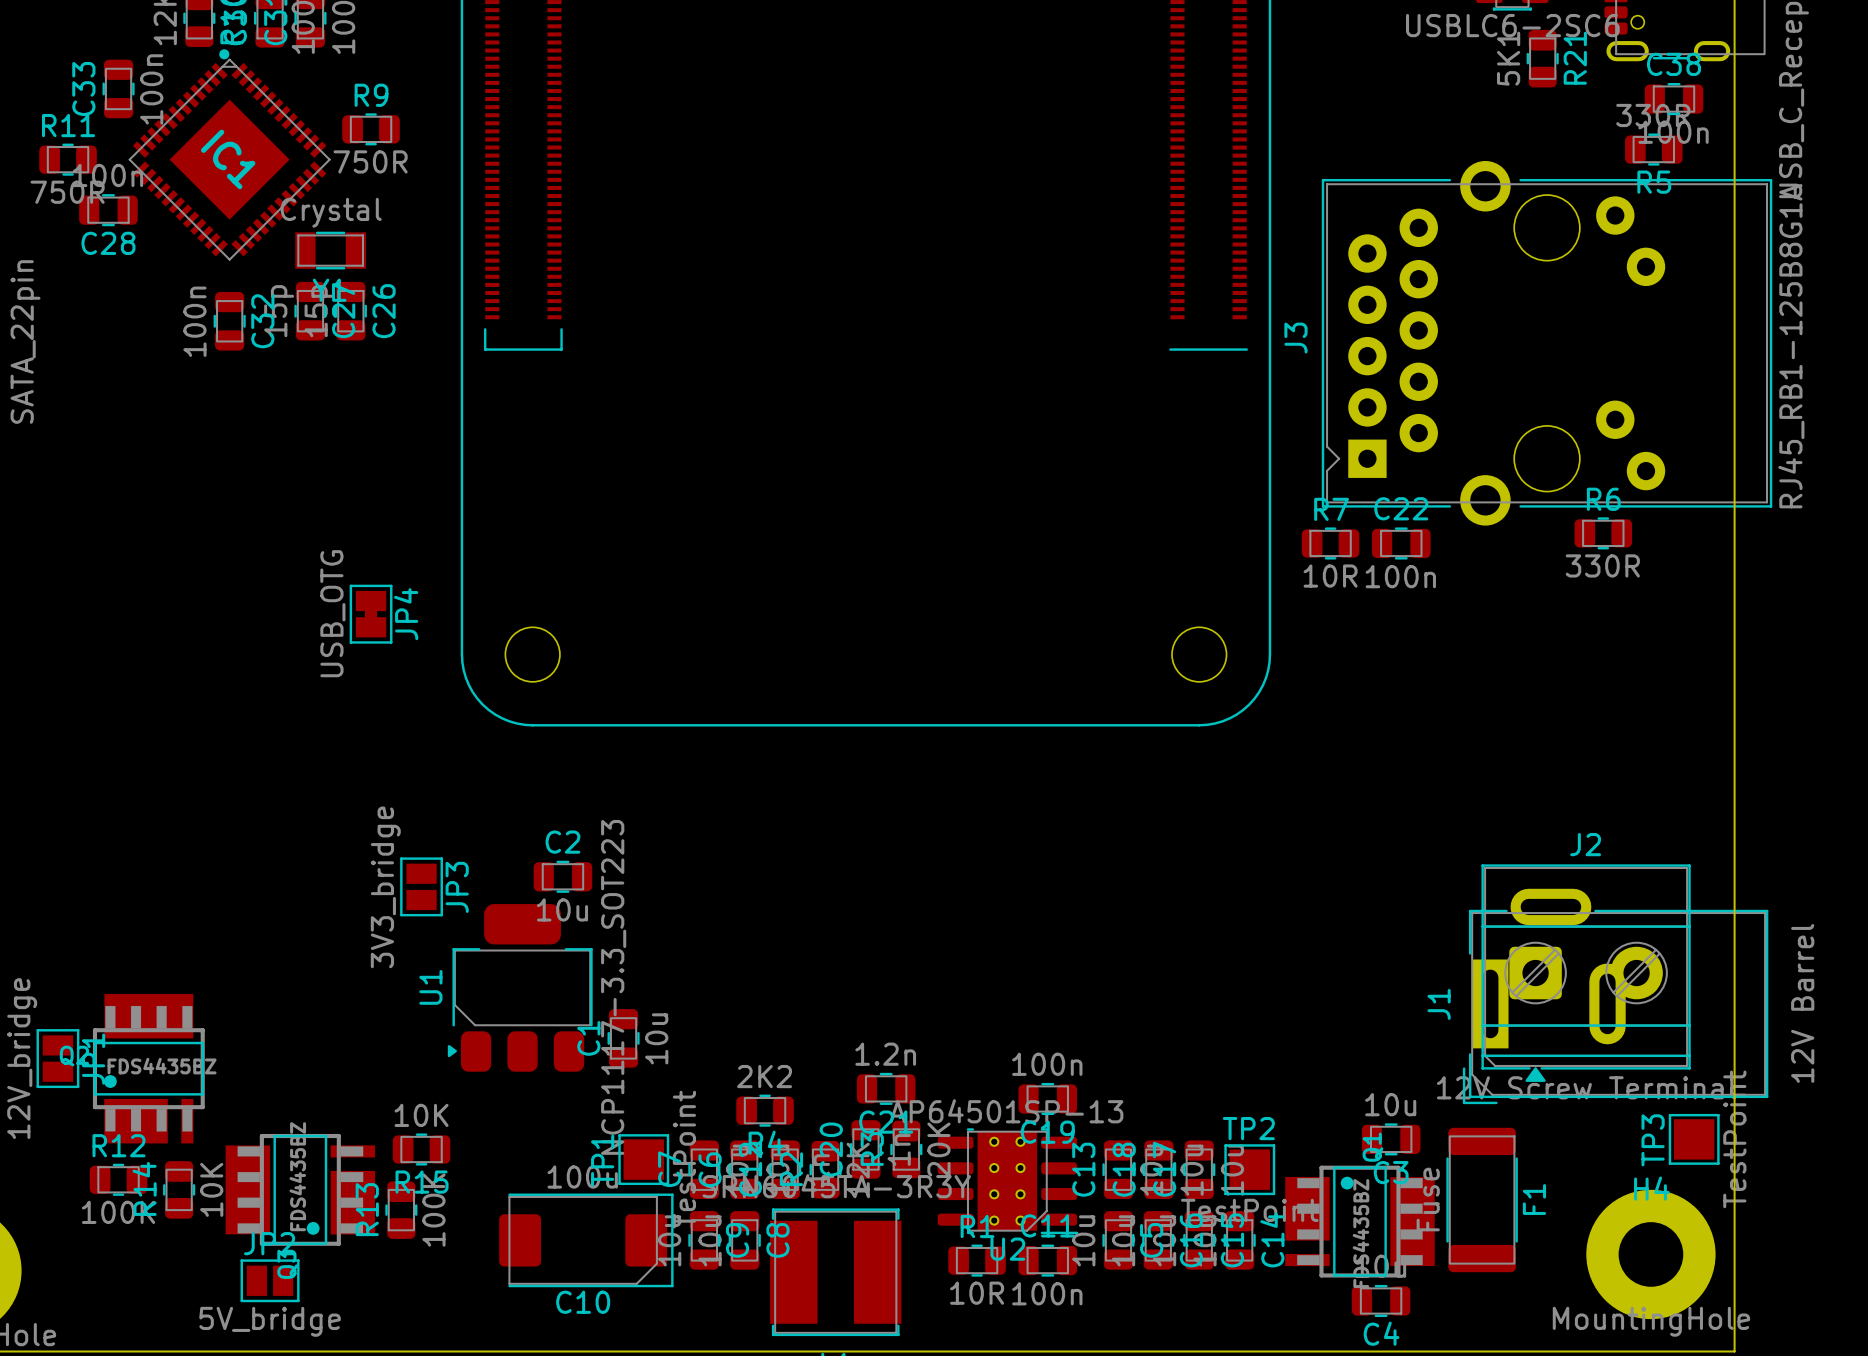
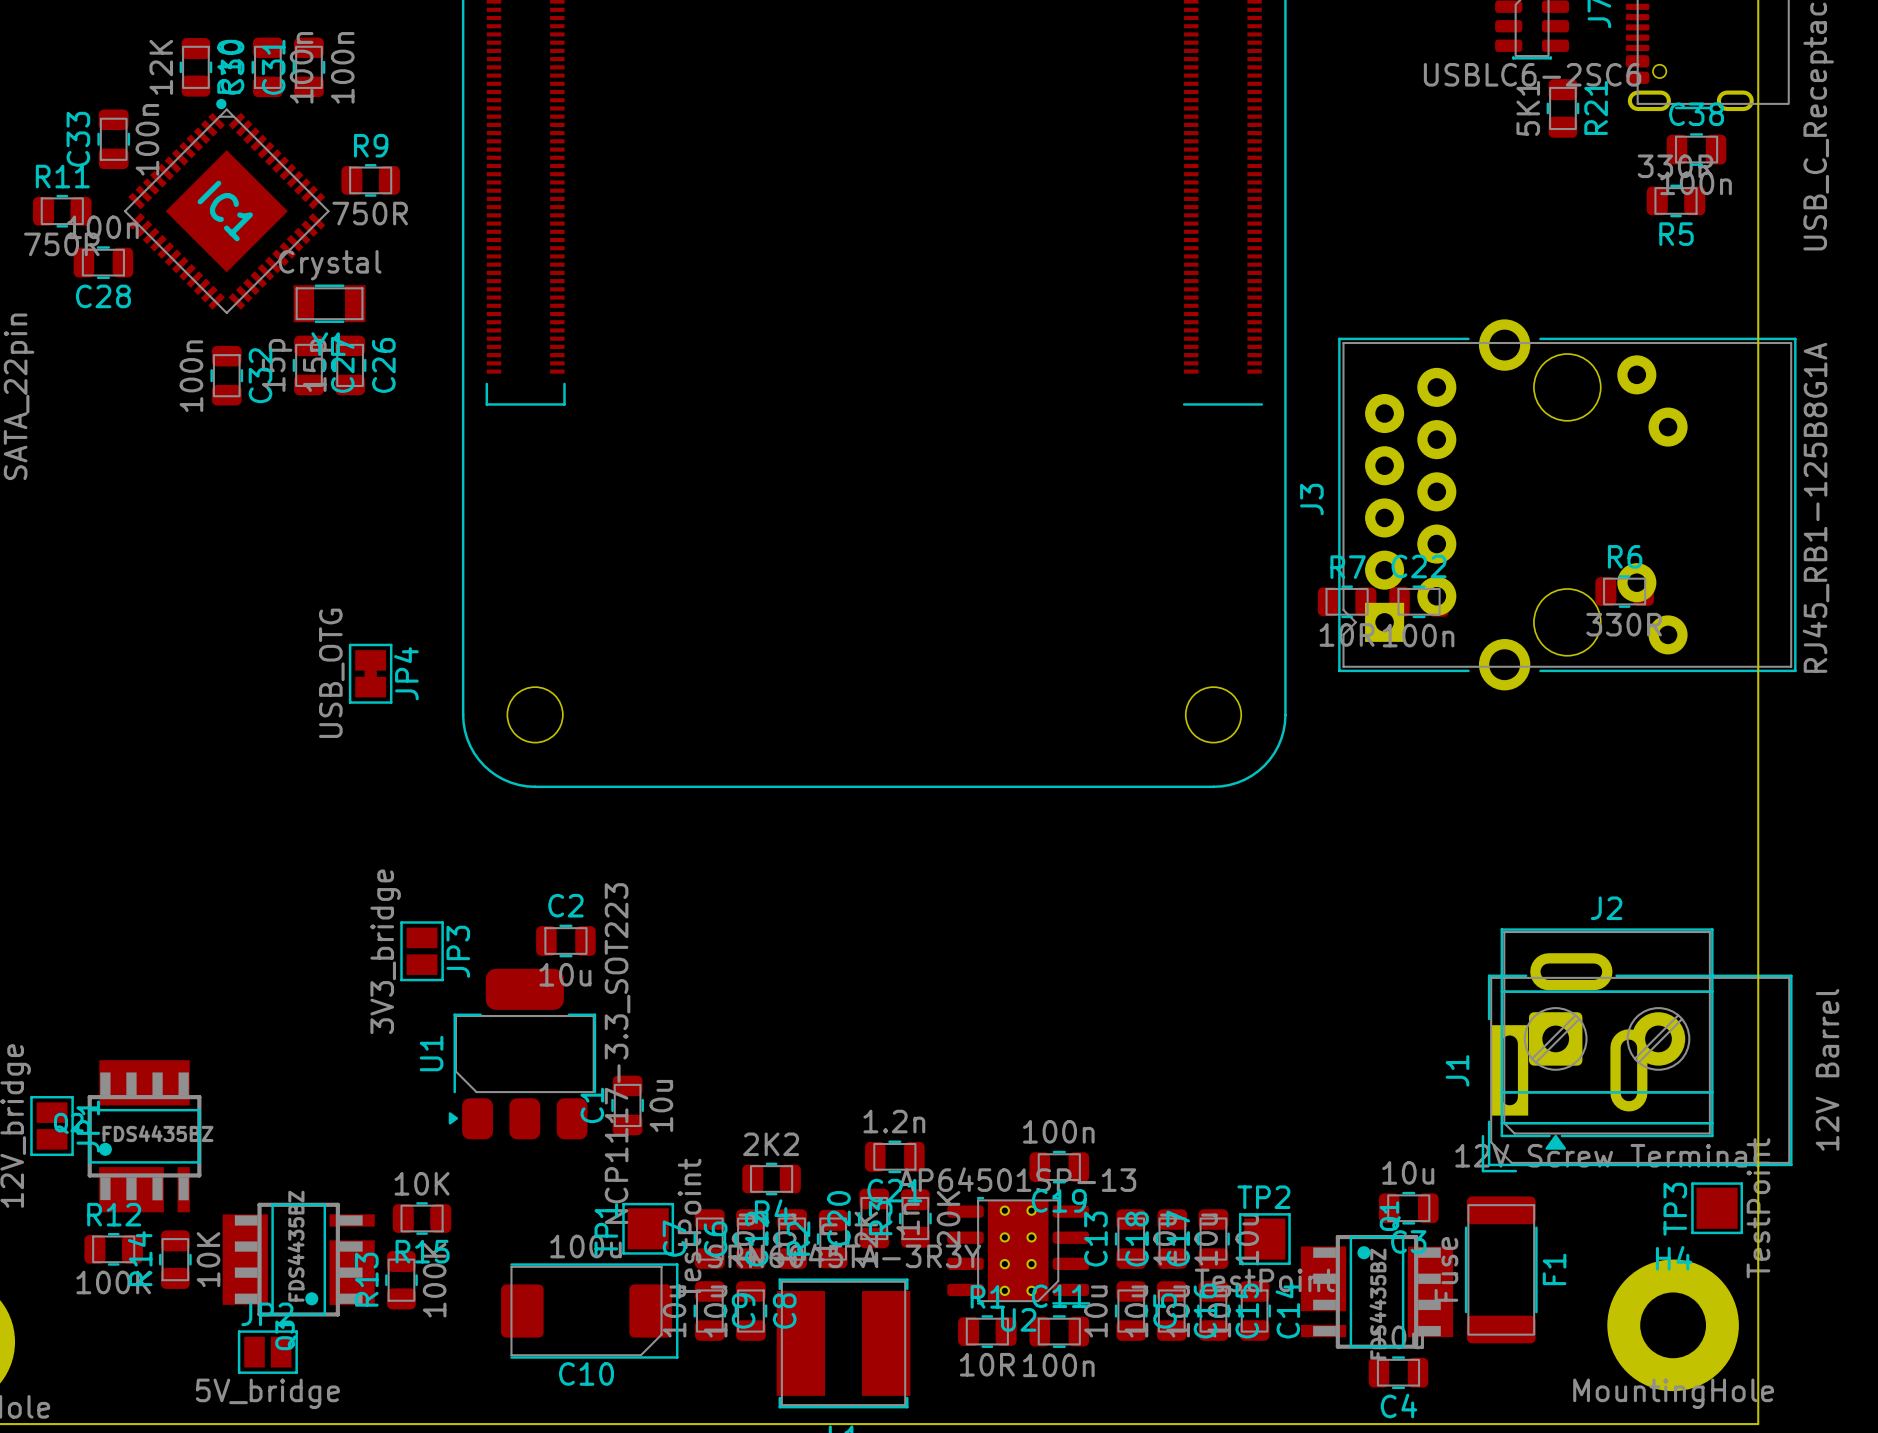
J3 position: (1547, 343) -> (1567, 504)

